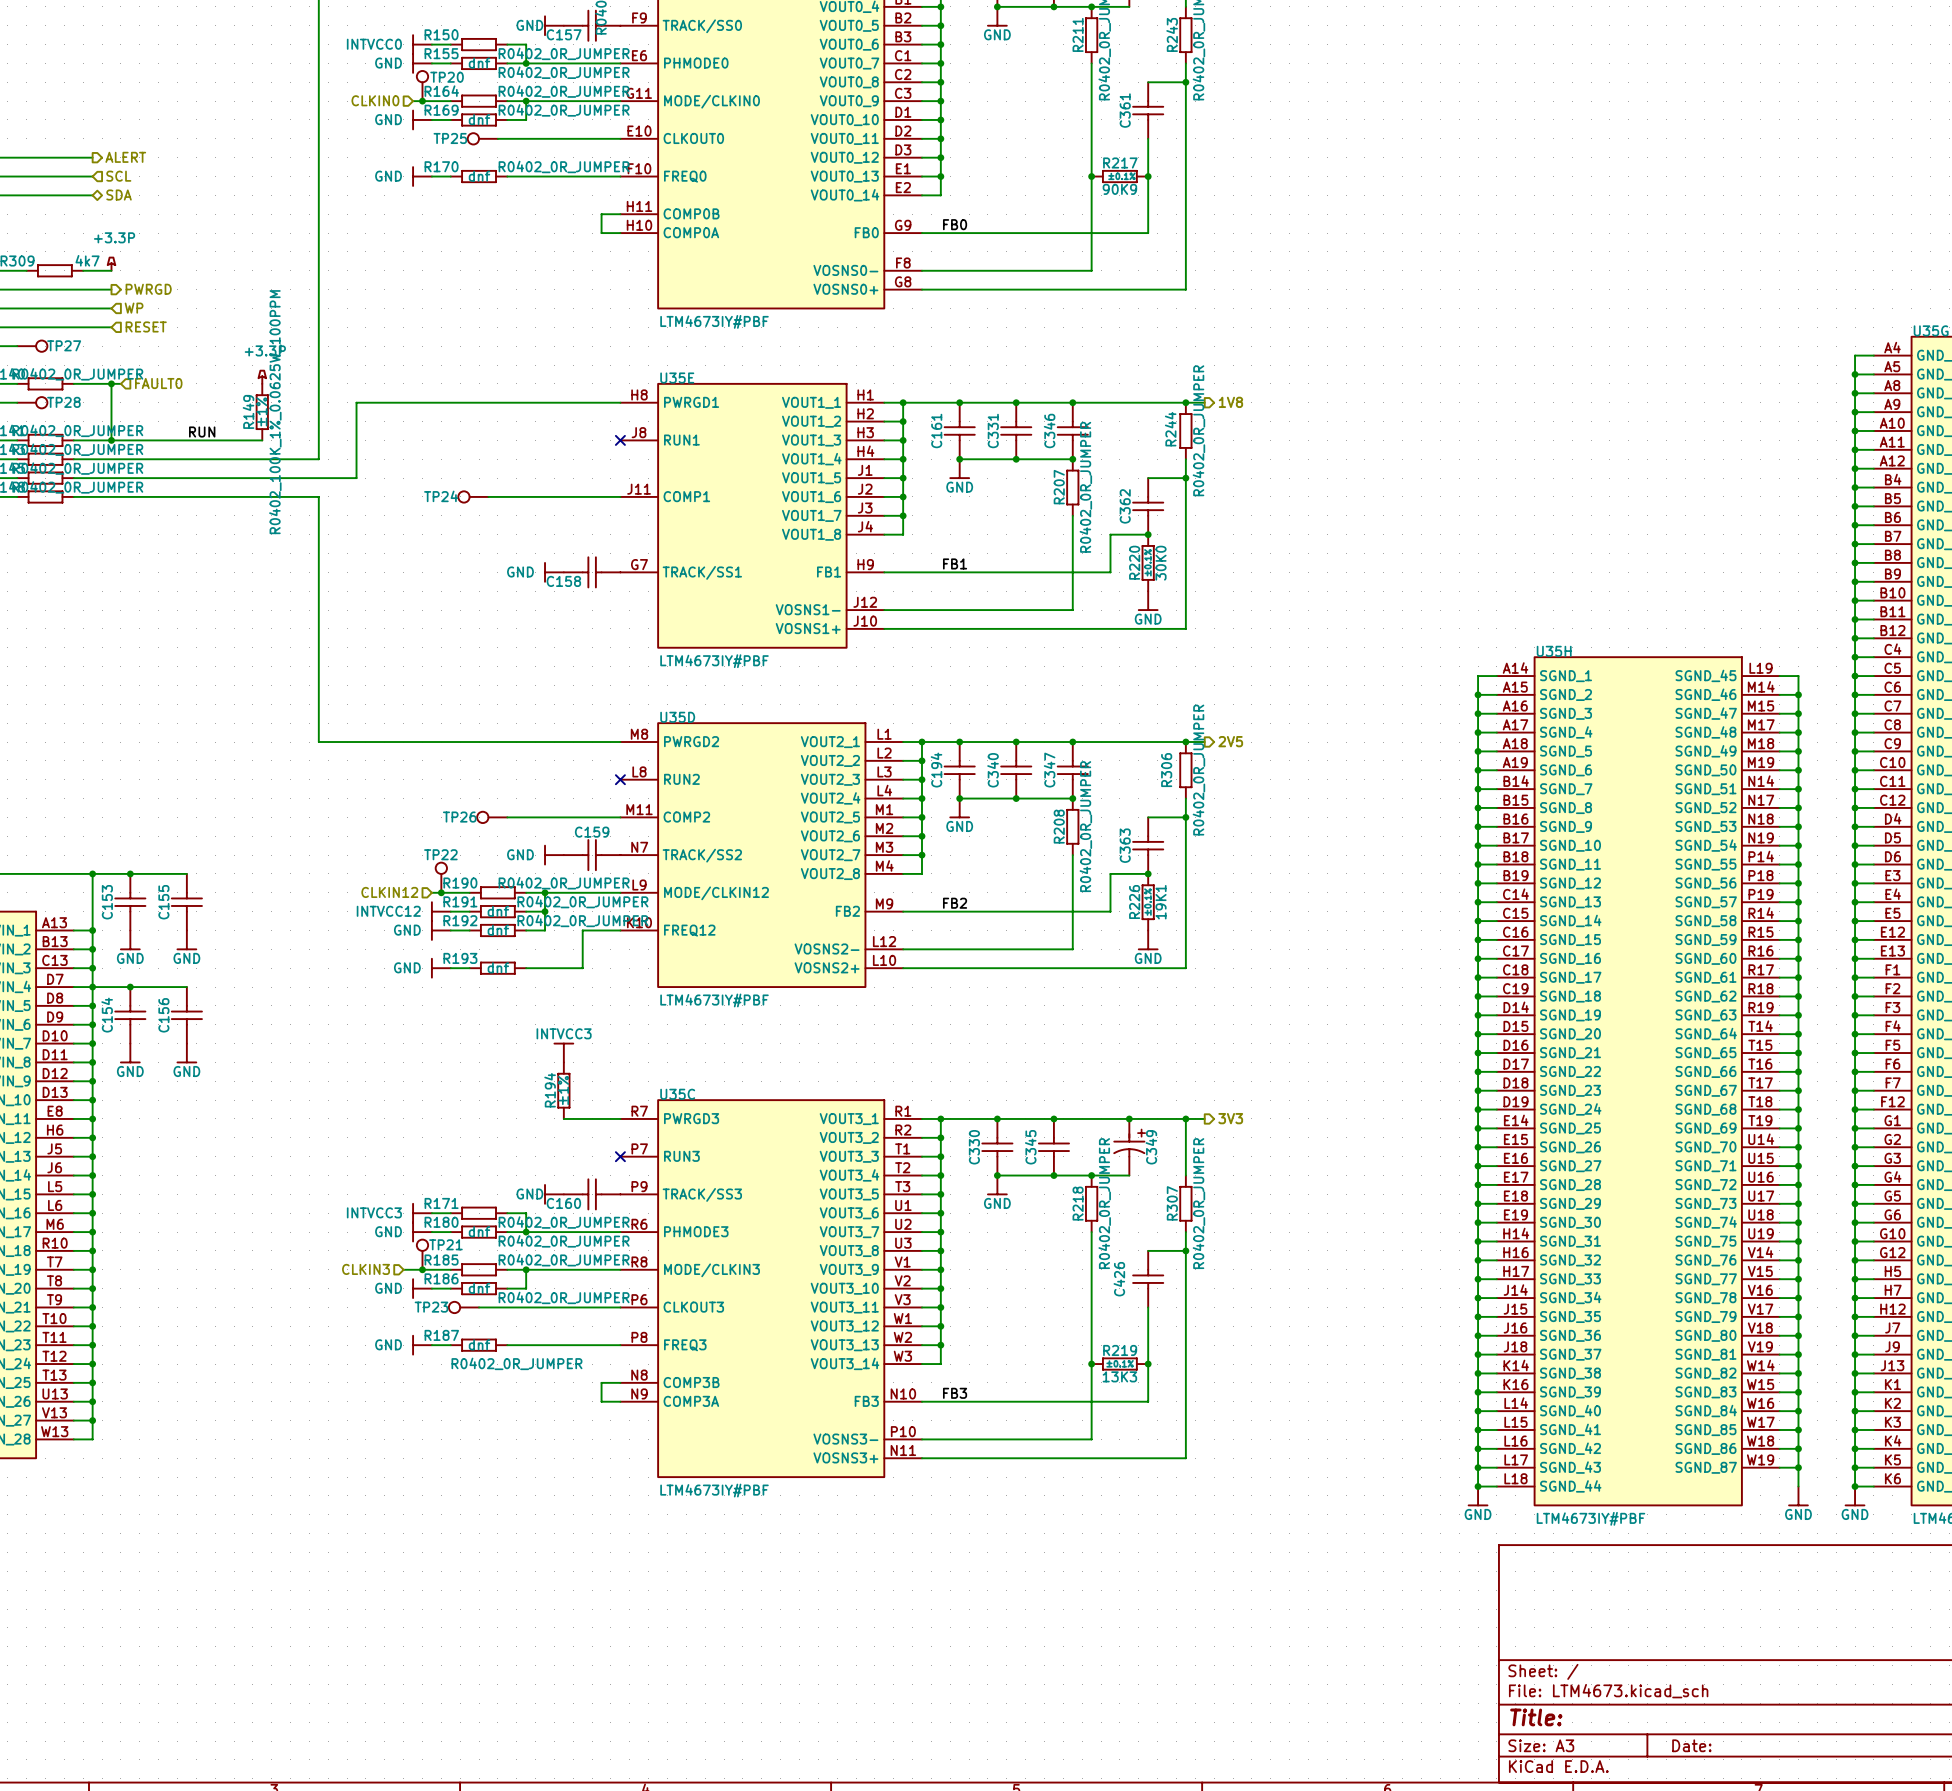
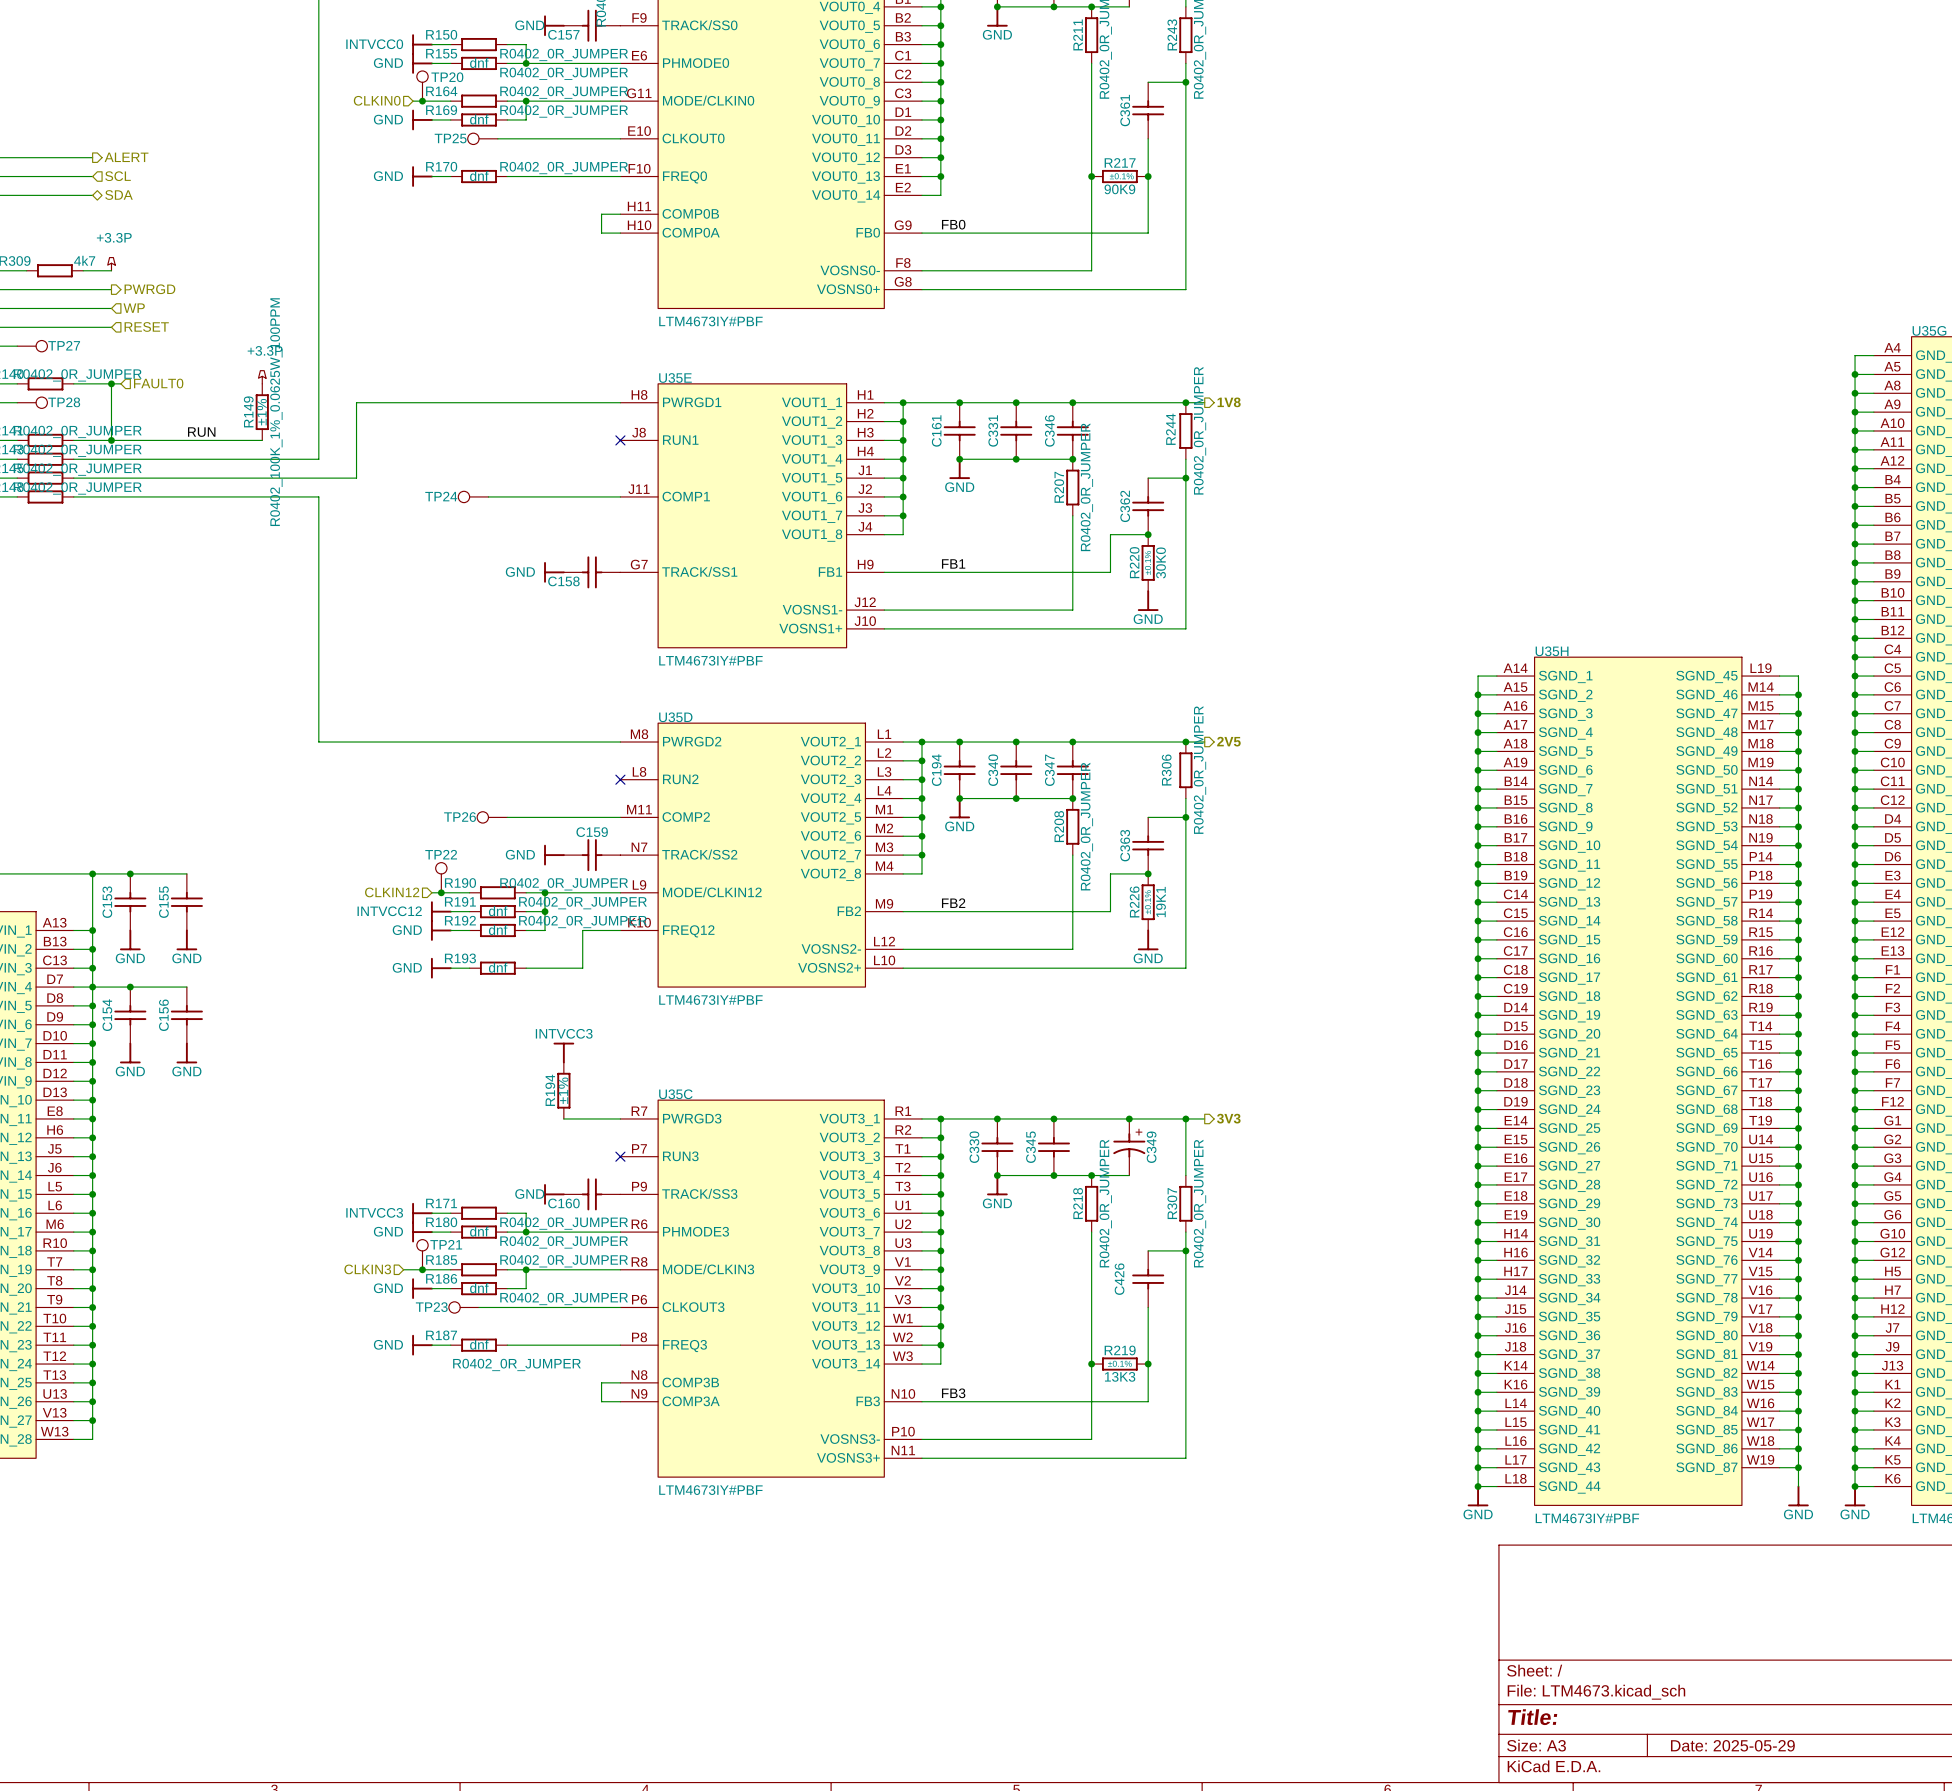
title block: Date: (1691, 1745) -> Date: 2025-05-29 (1732, 1745)

